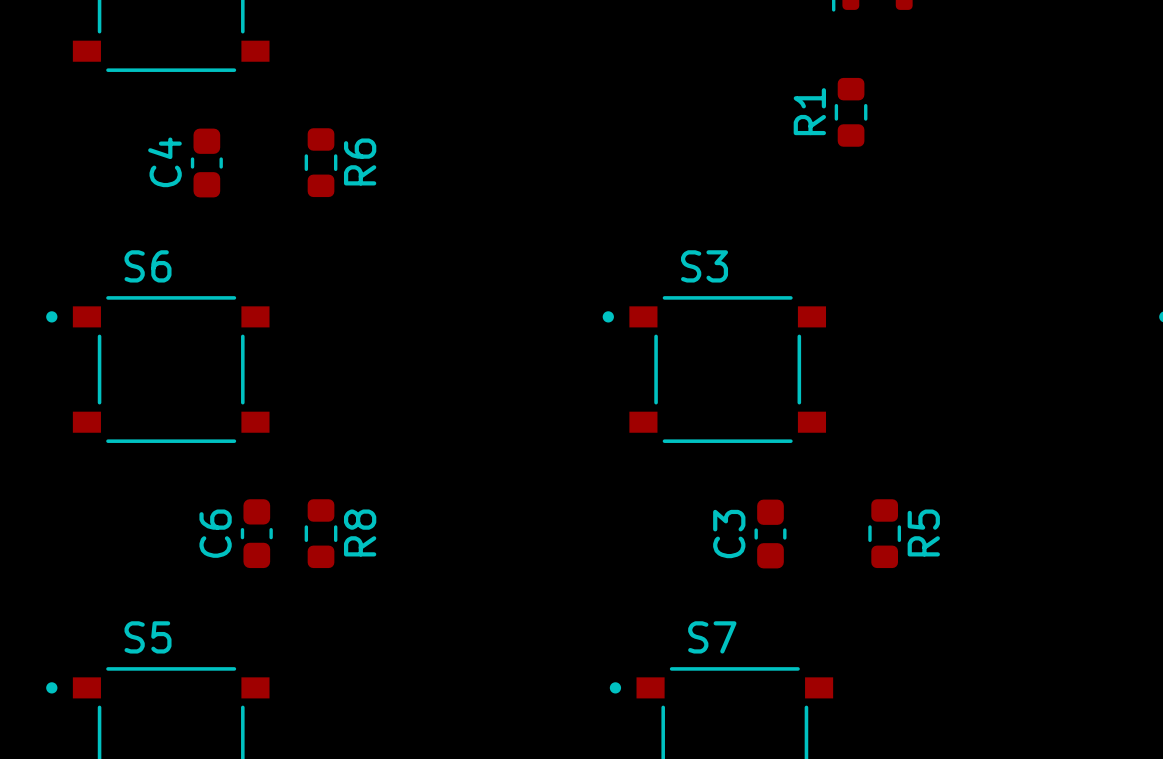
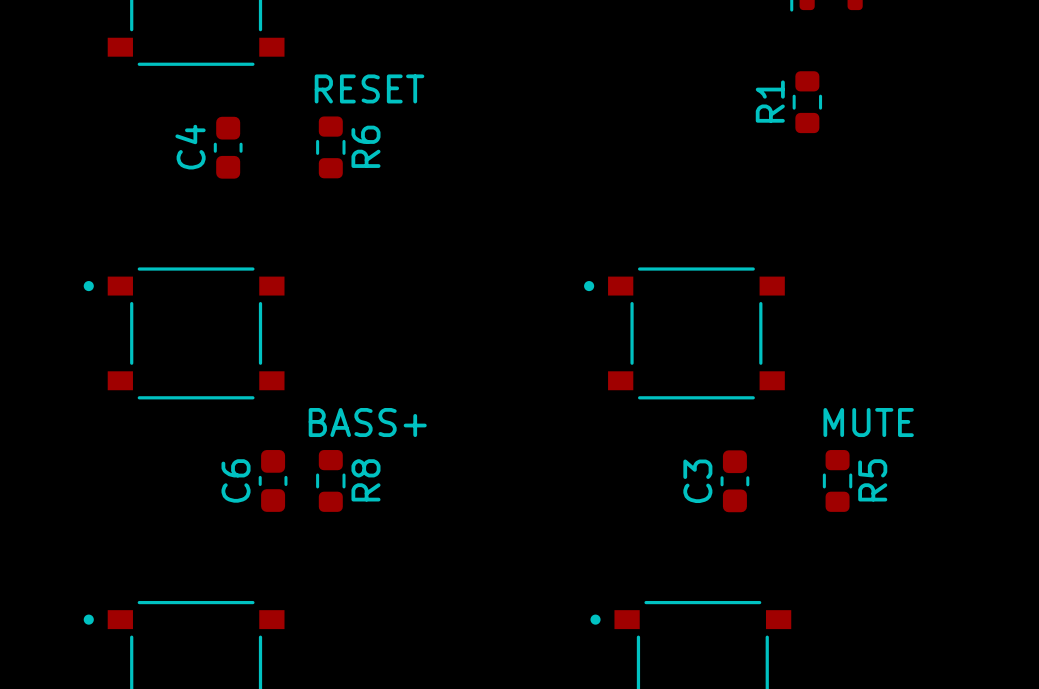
part value: none -> RESET (369, 88)
S6 name: S6 (148, 266) -> none
S3 name: S3 (704, 266) -> none
S6 value: none -> BASS+ (367, 422)
S3 value: none -> MUTE (868, 422)
S5 name: S5 (148, 637) -> none
S7 name: S7 (712, 637) -> none

